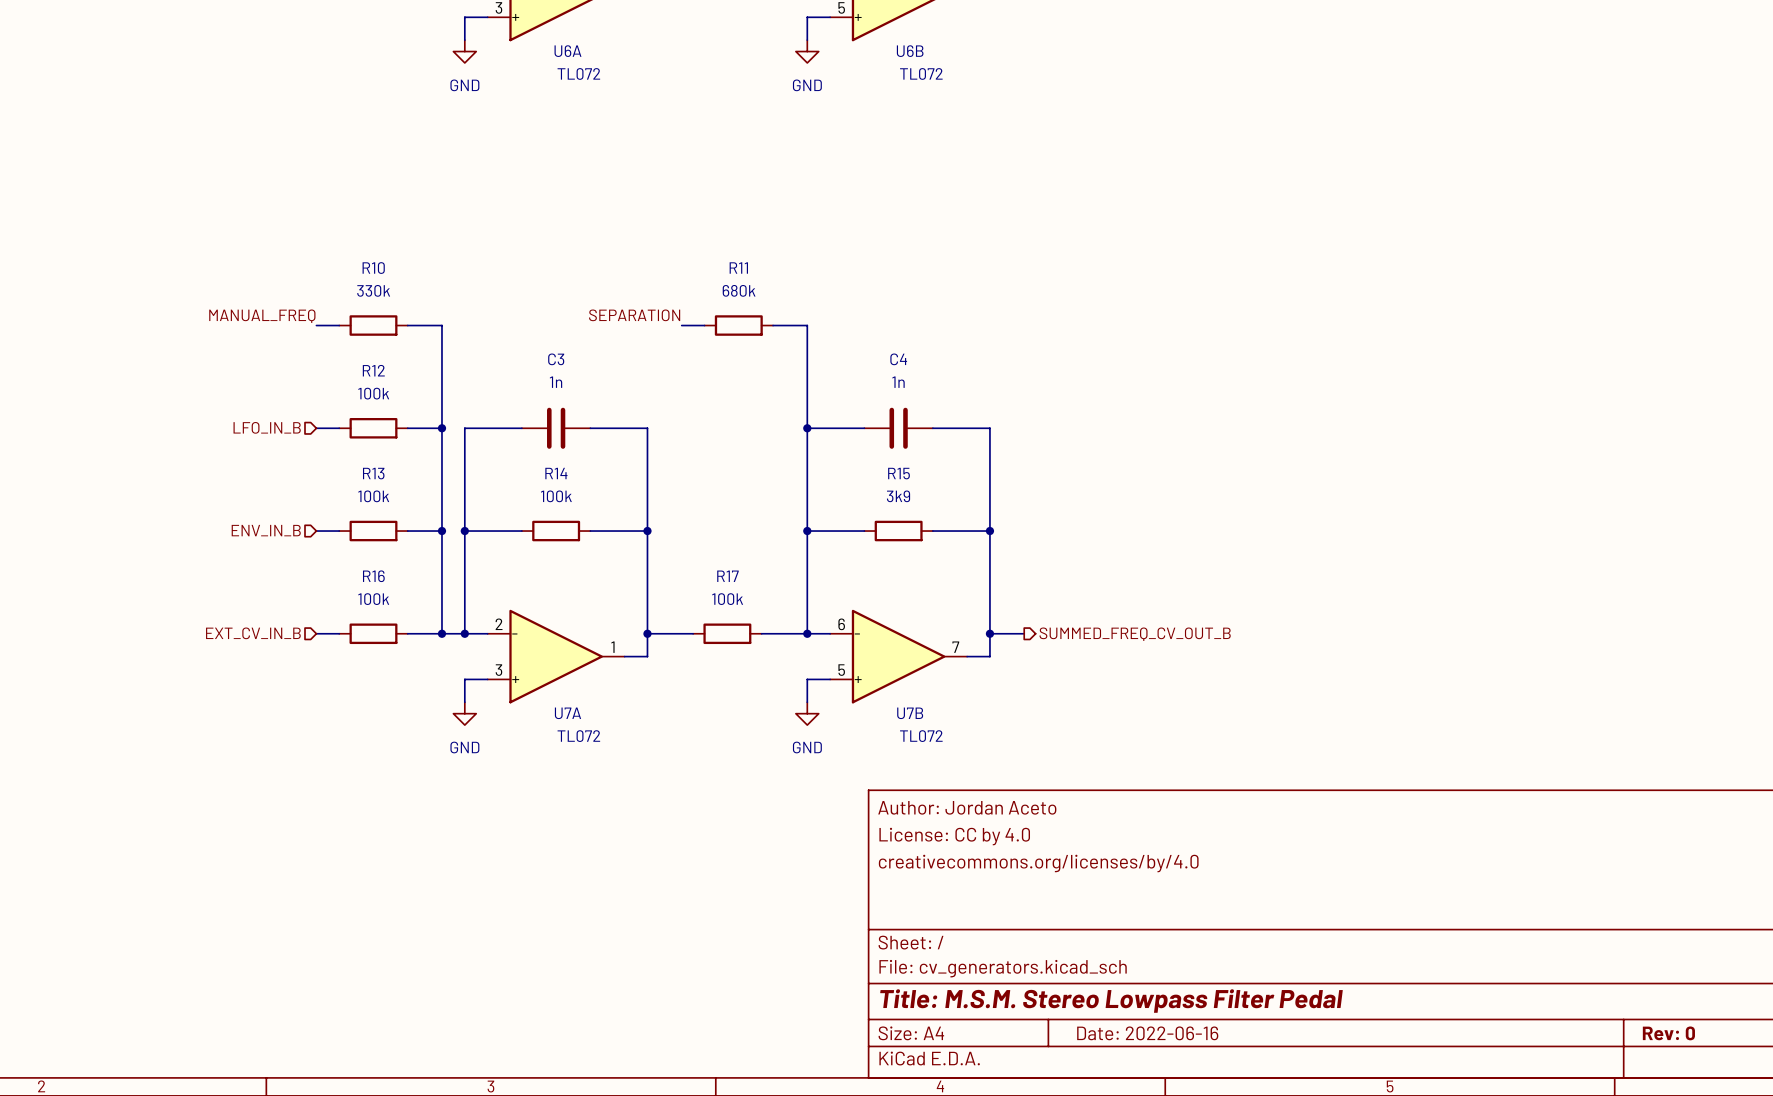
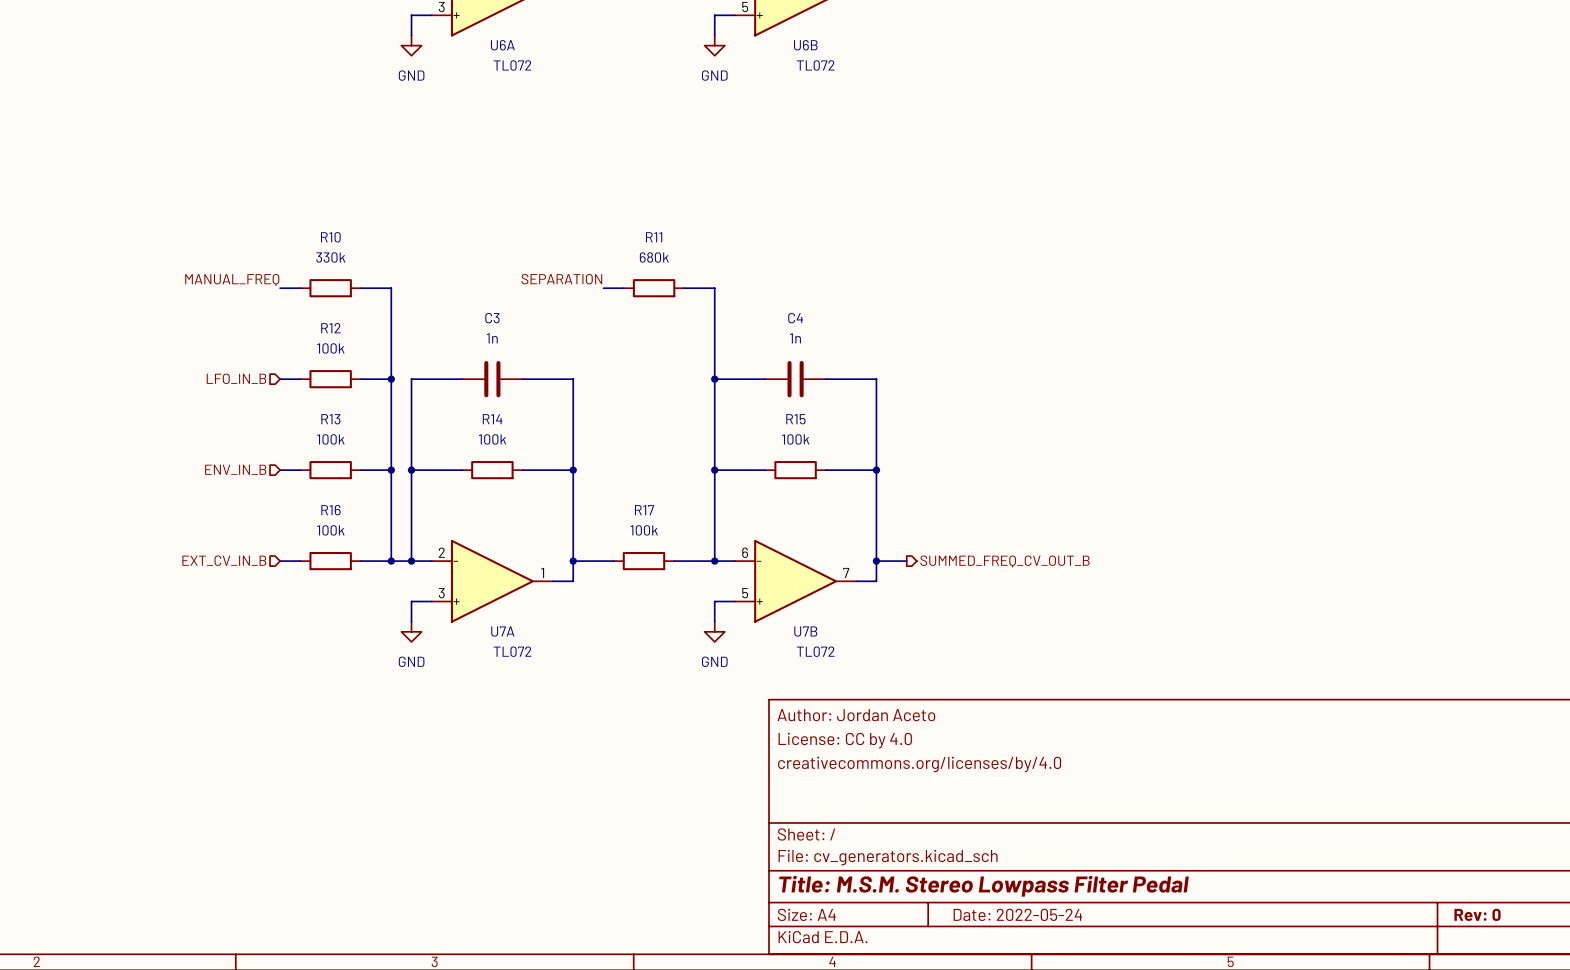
R15 value: 3k9 (898, 496) -> 100k (795, 439)
title block: Date: 2022-06-16 (1147, 1033) -> Date: 2022-05-24 (1017, 914)

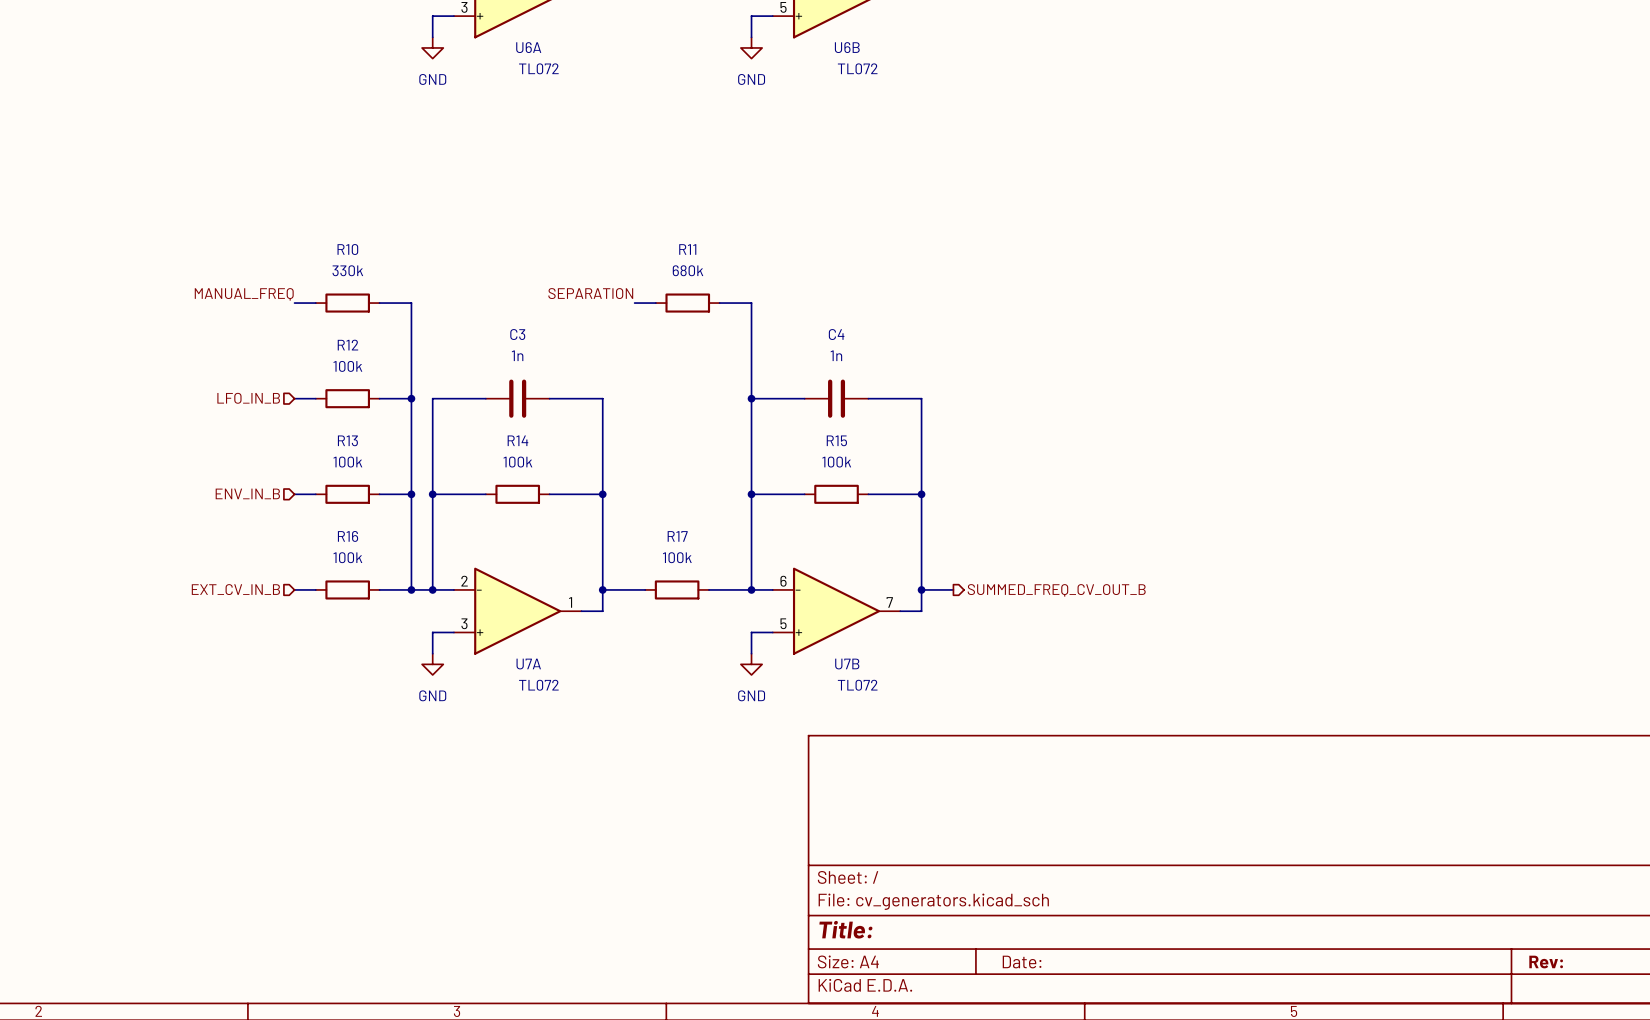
title block: Author: Jordan Aceto (856, 715) -> none
title block: License: CC by 4.0 (845, 740) -> none
title block: creativecommons.org/licenses/by/4.0 (919, 764) -> none
title block: Title: M.S.M. Stereo Lowpass Filter Pedal (984, 886) -> Title: (845, 929)
title block: Date: 2022-05-24 (1017, 914) -> Date: (1022, 962)
title block: Rev: 0 (1477, 914) -> Rev: (1546, 962)

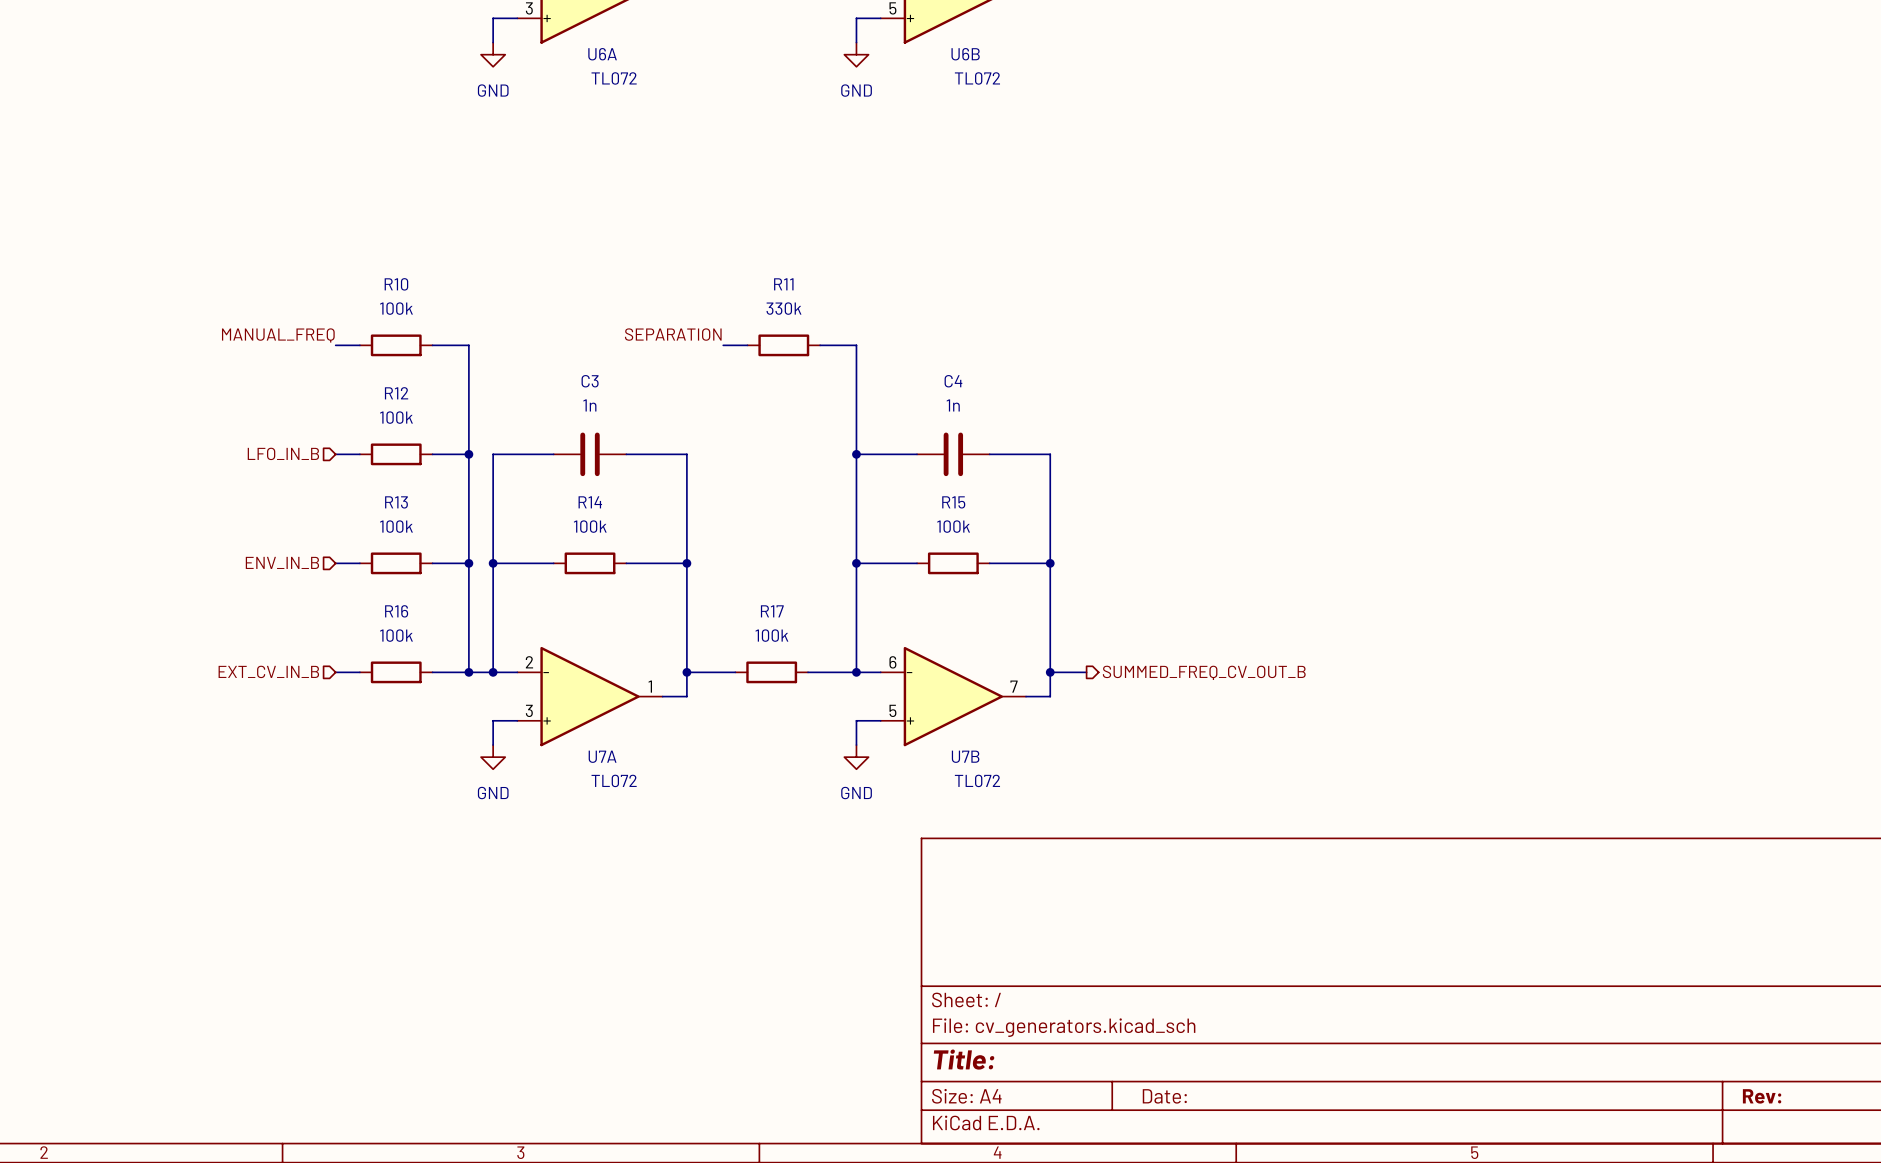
R10 value: 330k (347, 270) -> 100k (396, 308)
R11 value: 680k (688, 270) -> 330k (783, 308)

